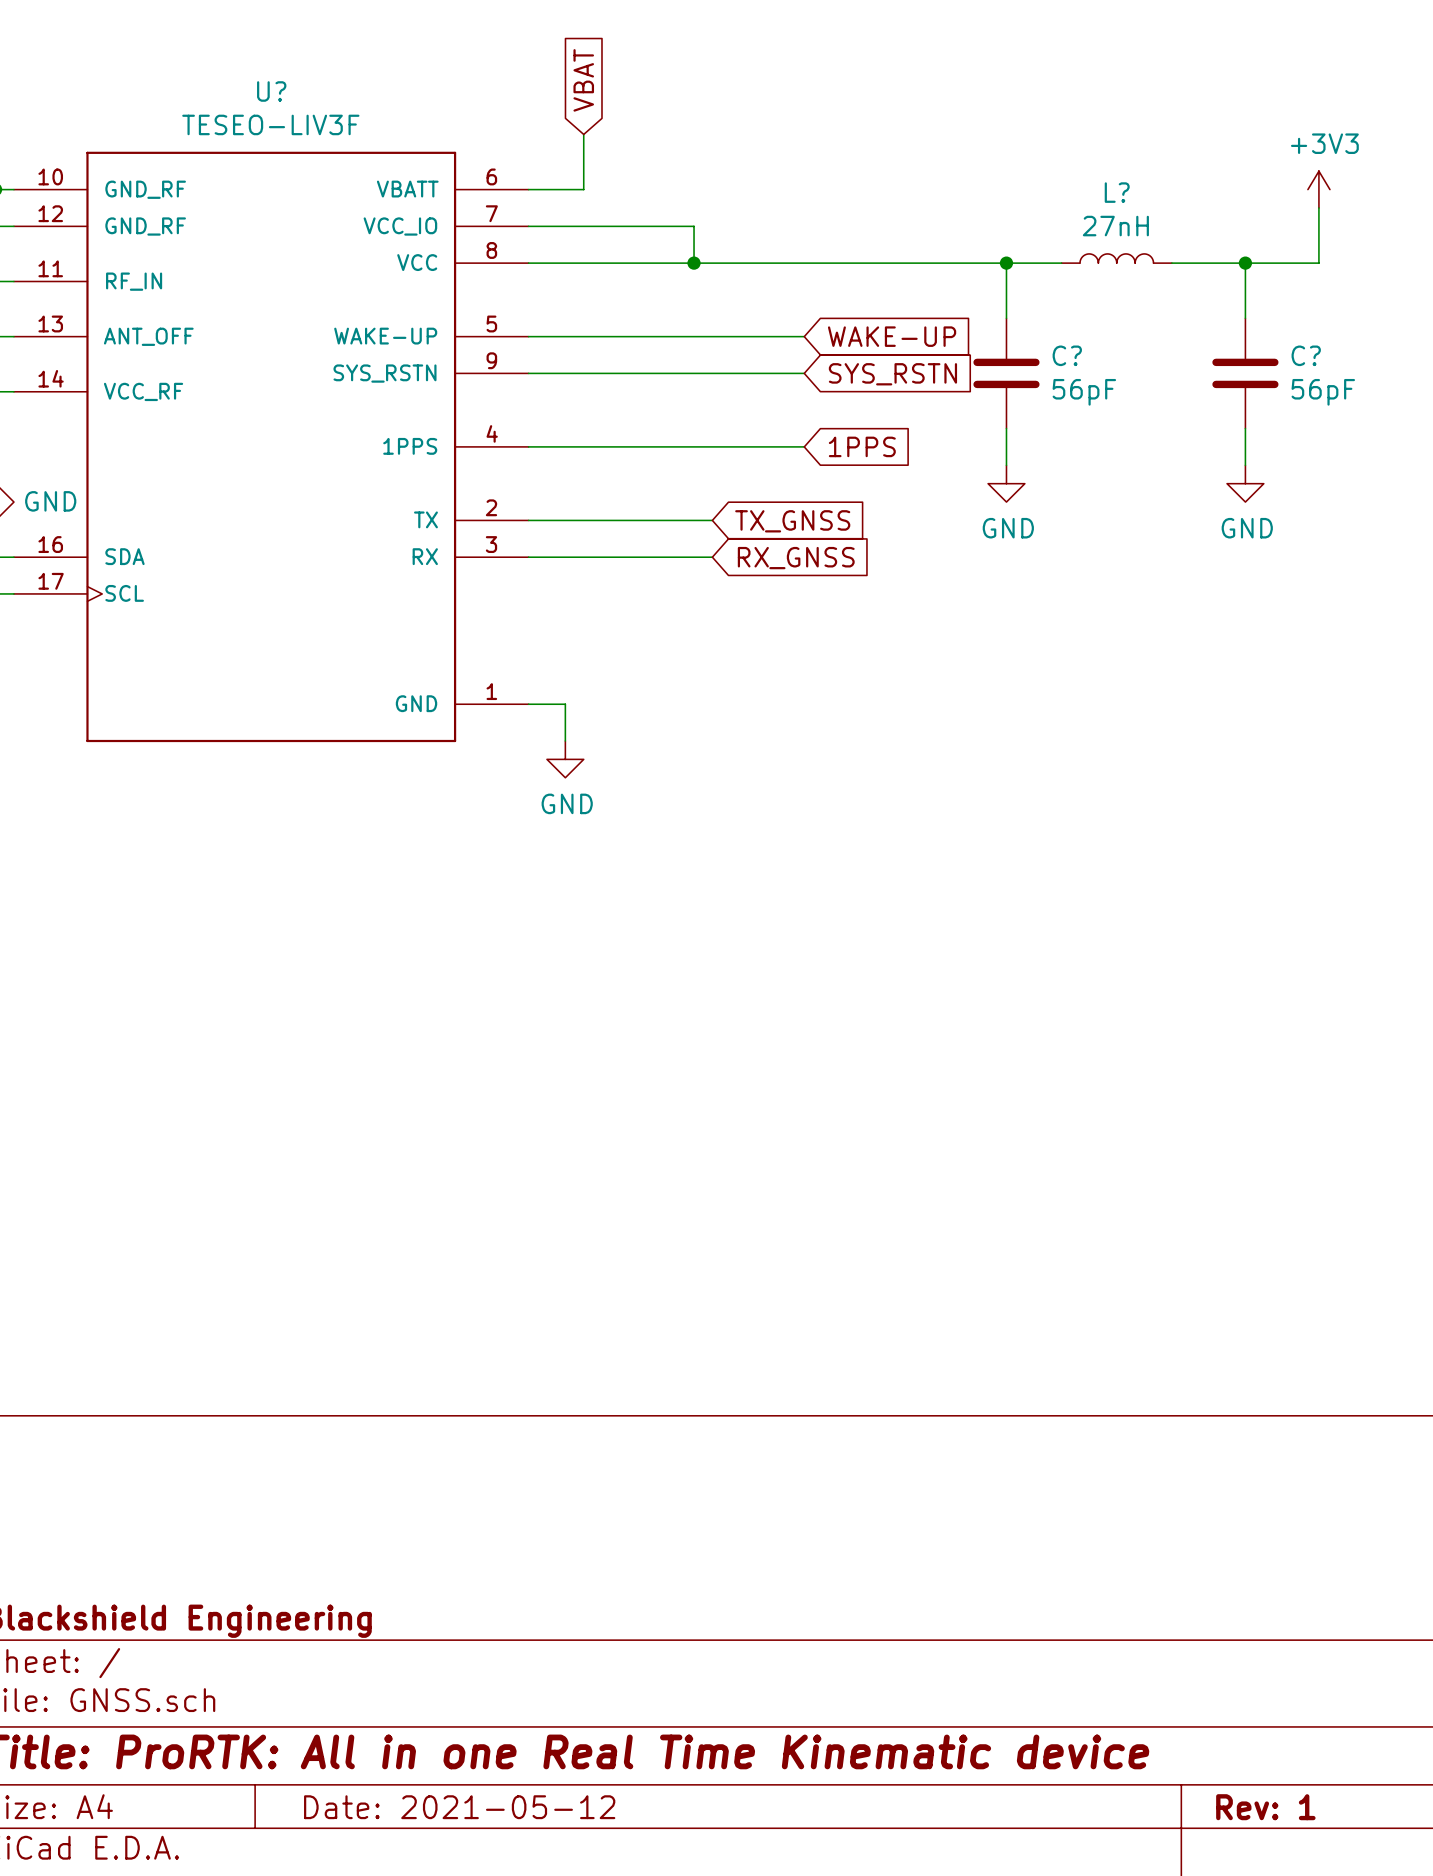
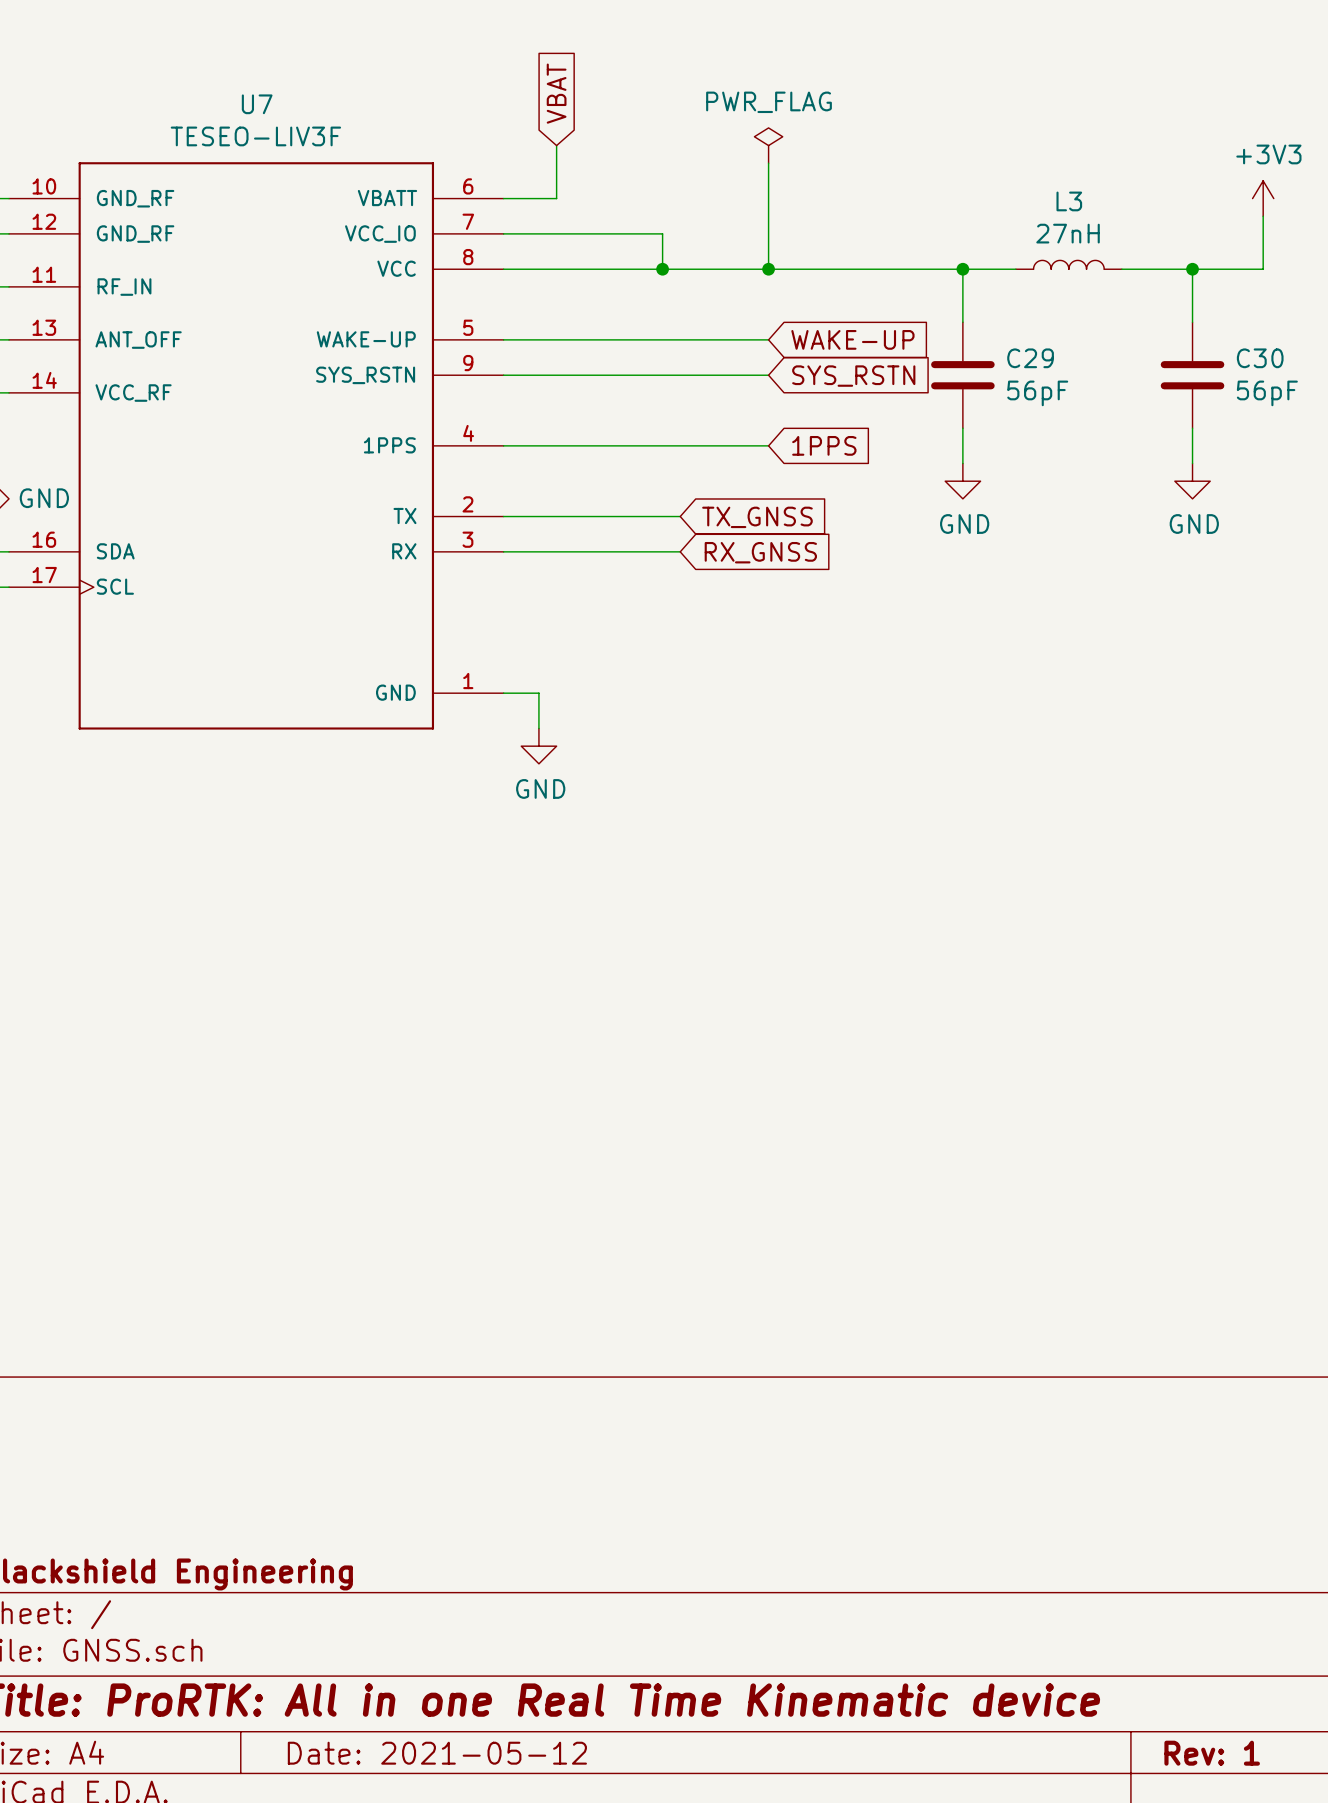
U? name: U? (271, 91) -> U7 (257, 104)
power symbol: none -> PWR_FLAG (768, 145)
wire: none -> (768, 163) (768, 269)
L? name: L? (1117, 192) -> L3 (1069, 201)
junction: none -> (768, 269)
C? name: C? (1067, 355) -> C29 (1030, 358)
C? name: C? (1306, 355) -> C30 (1260, 358)

